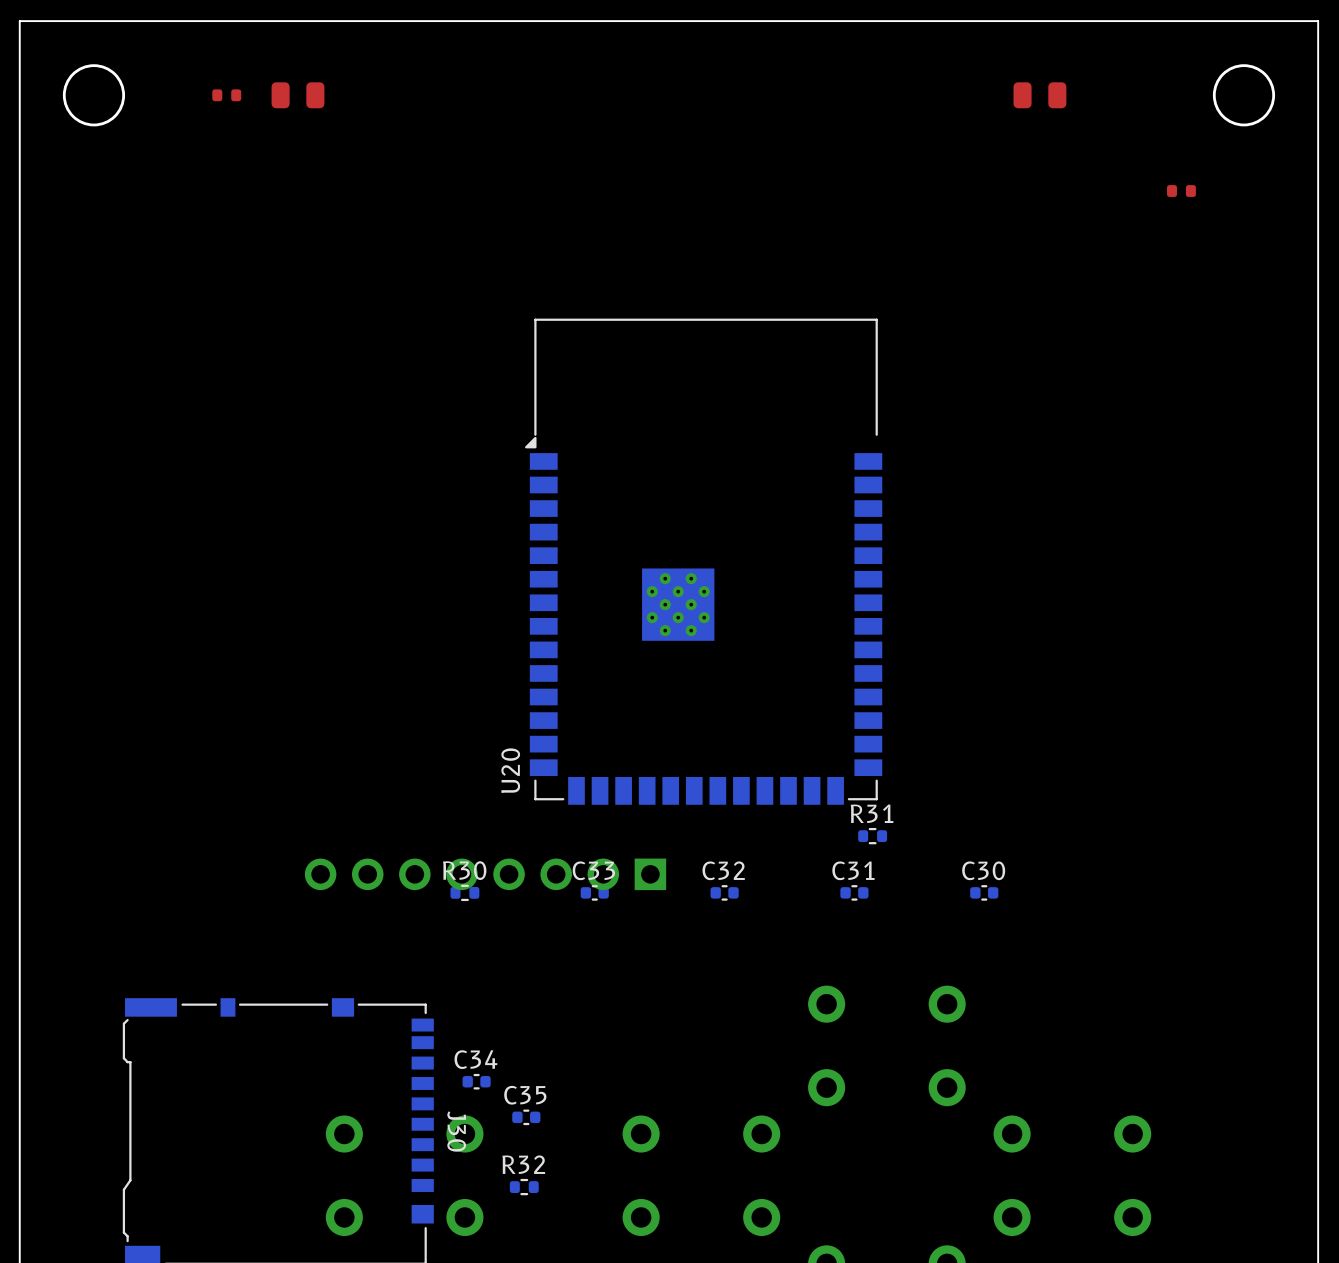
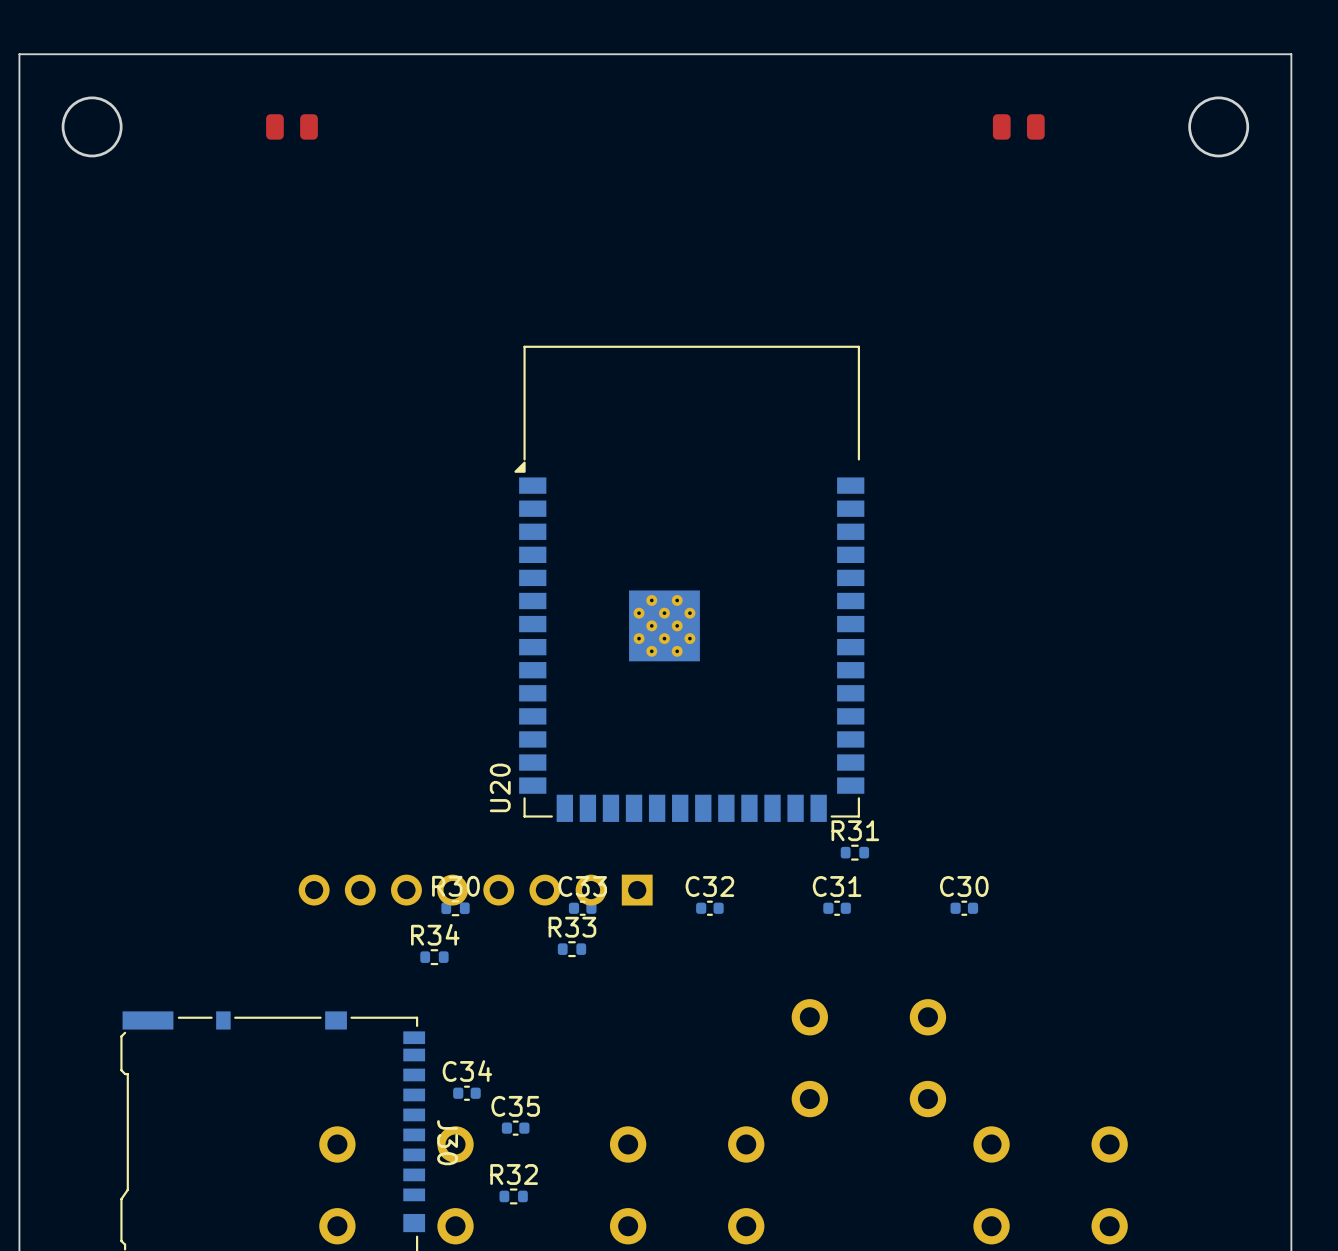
part: (226, 95) -> none
part: (1181, 191) -> none
R33: none -> (571, 949)
R34: none -> (434, 957)

